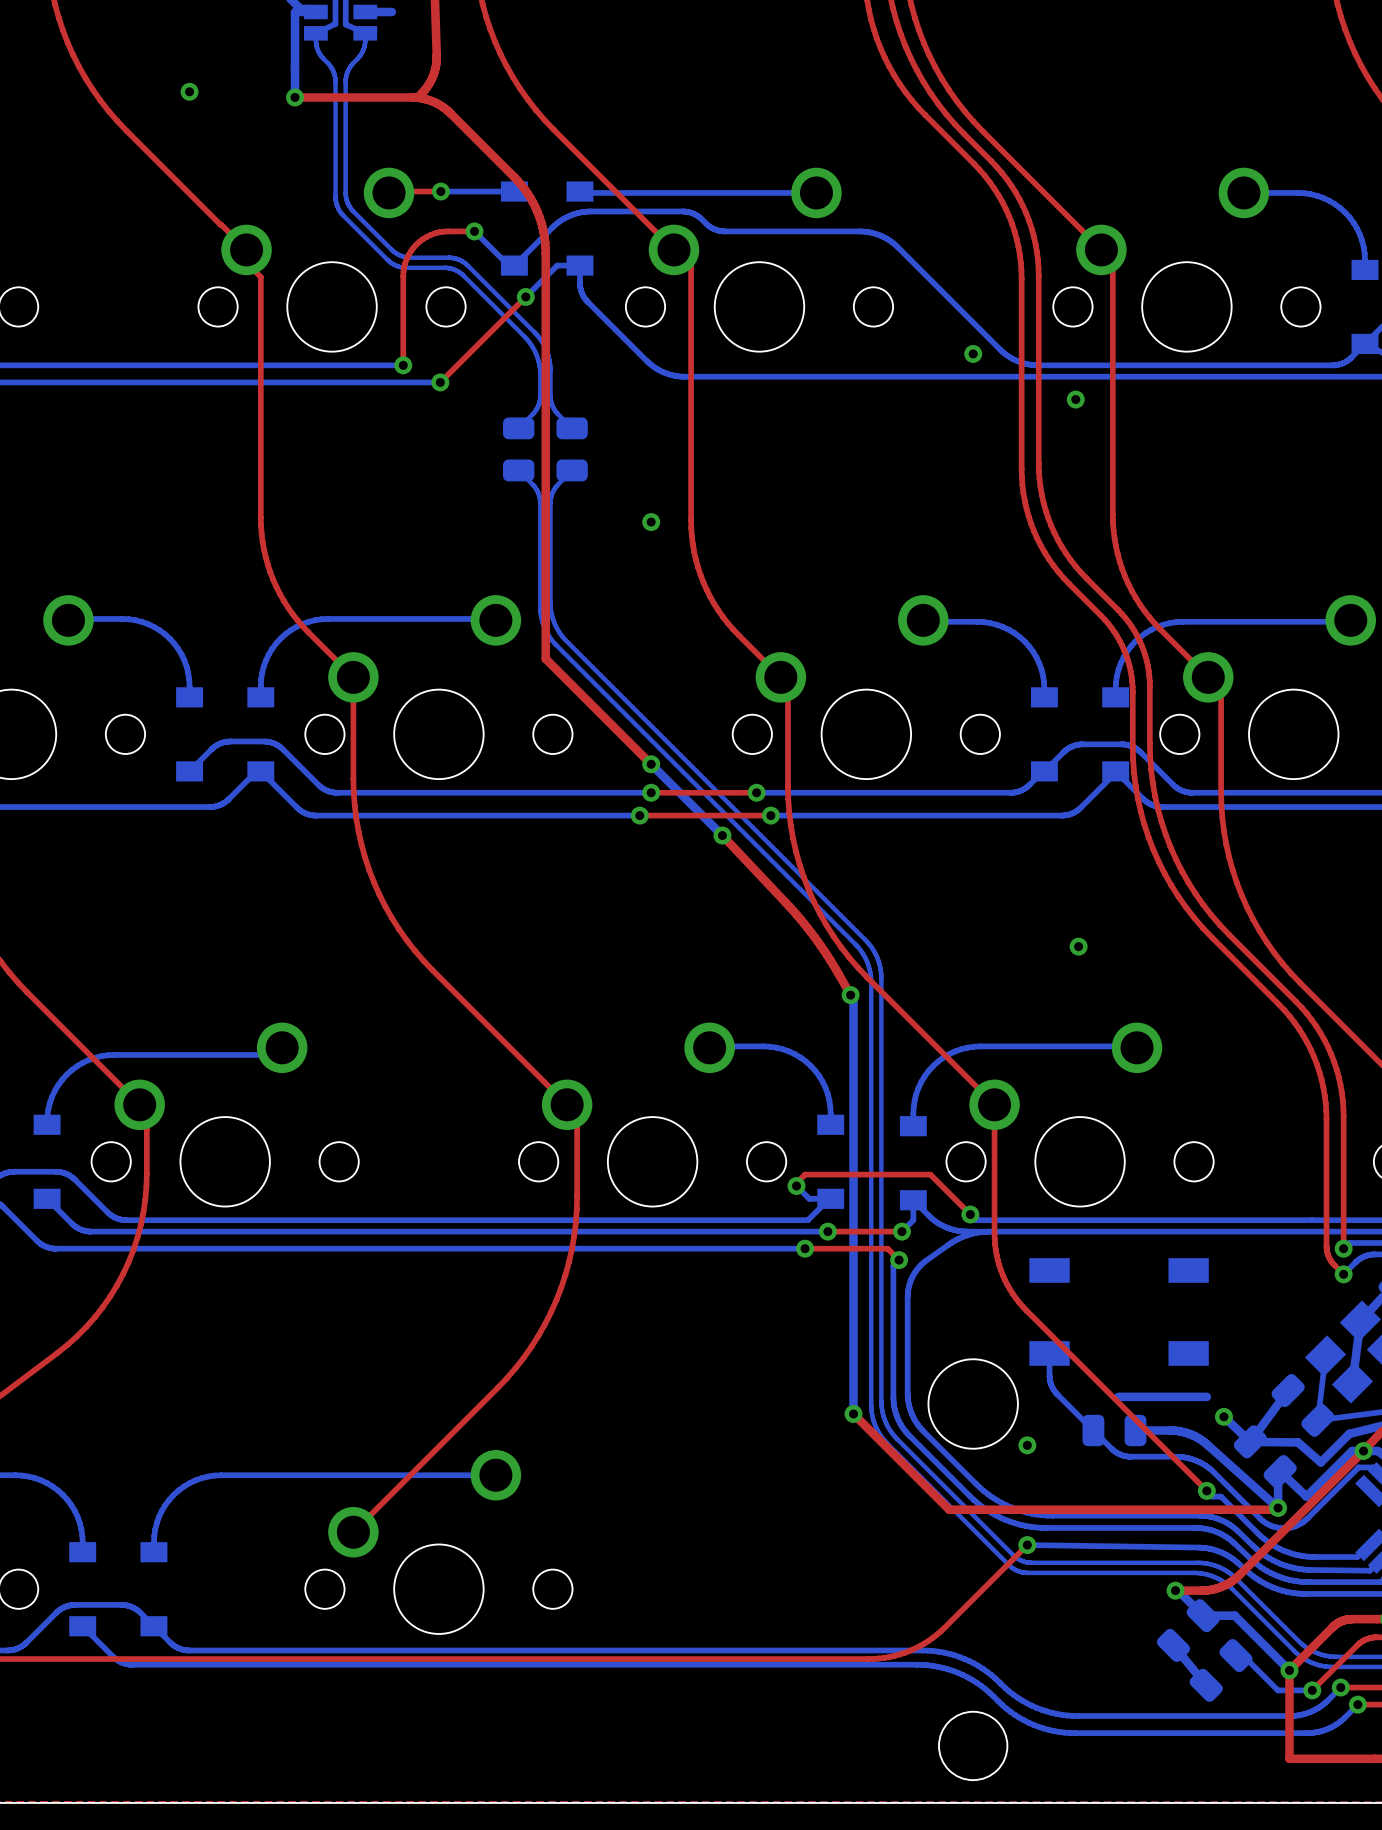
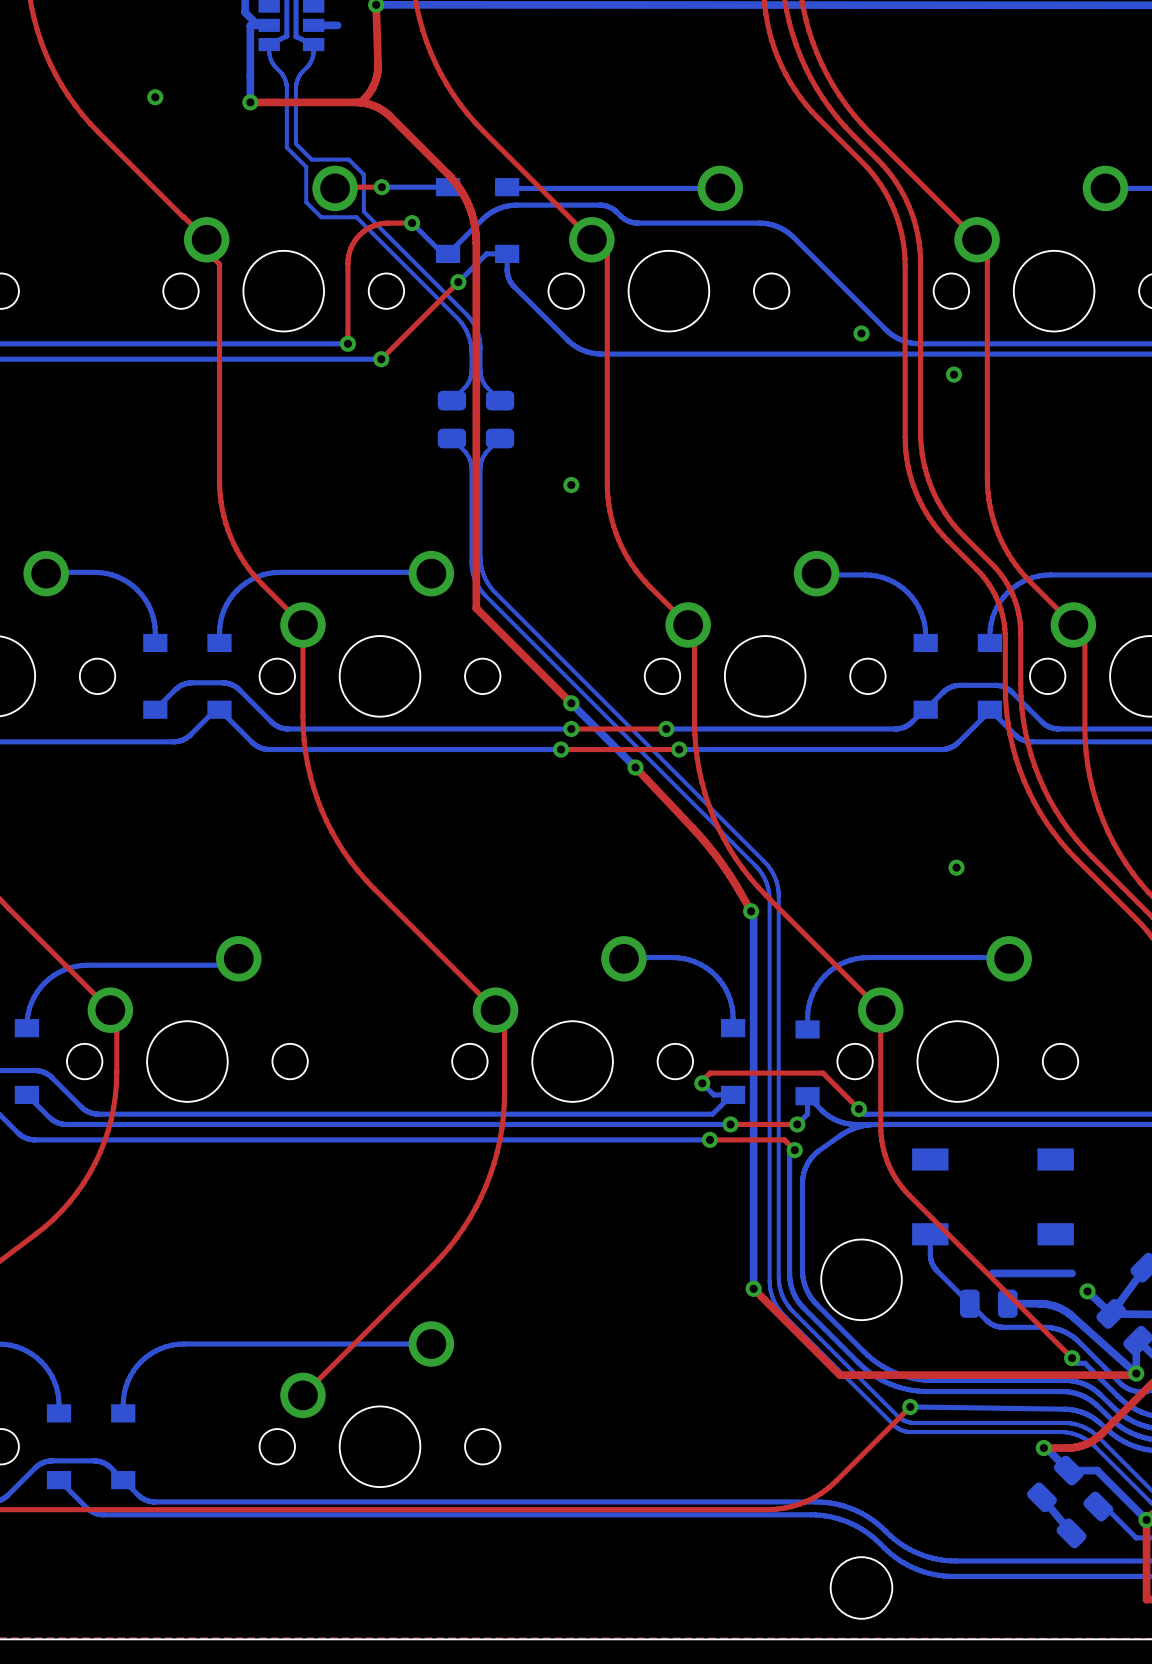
bottom track: (345, 143) (345, 193) (347, 202) (352, 210) (391, 249) (405, 257) (452, 258) (467, 265) -> (295, 143) (311, 159) (348, 159) (363, 174) (363, 211) (406, 253)
bottom track: (335, 147) (335, 199) (338, 208) (343, 215) (395, 265) (405, 267) (448, 268) (463, 275) -> (286, 147) (306, 167) (306, 202) (321, 217) (356, 217) (402, 263)
via: (1027, 1445) -> none

